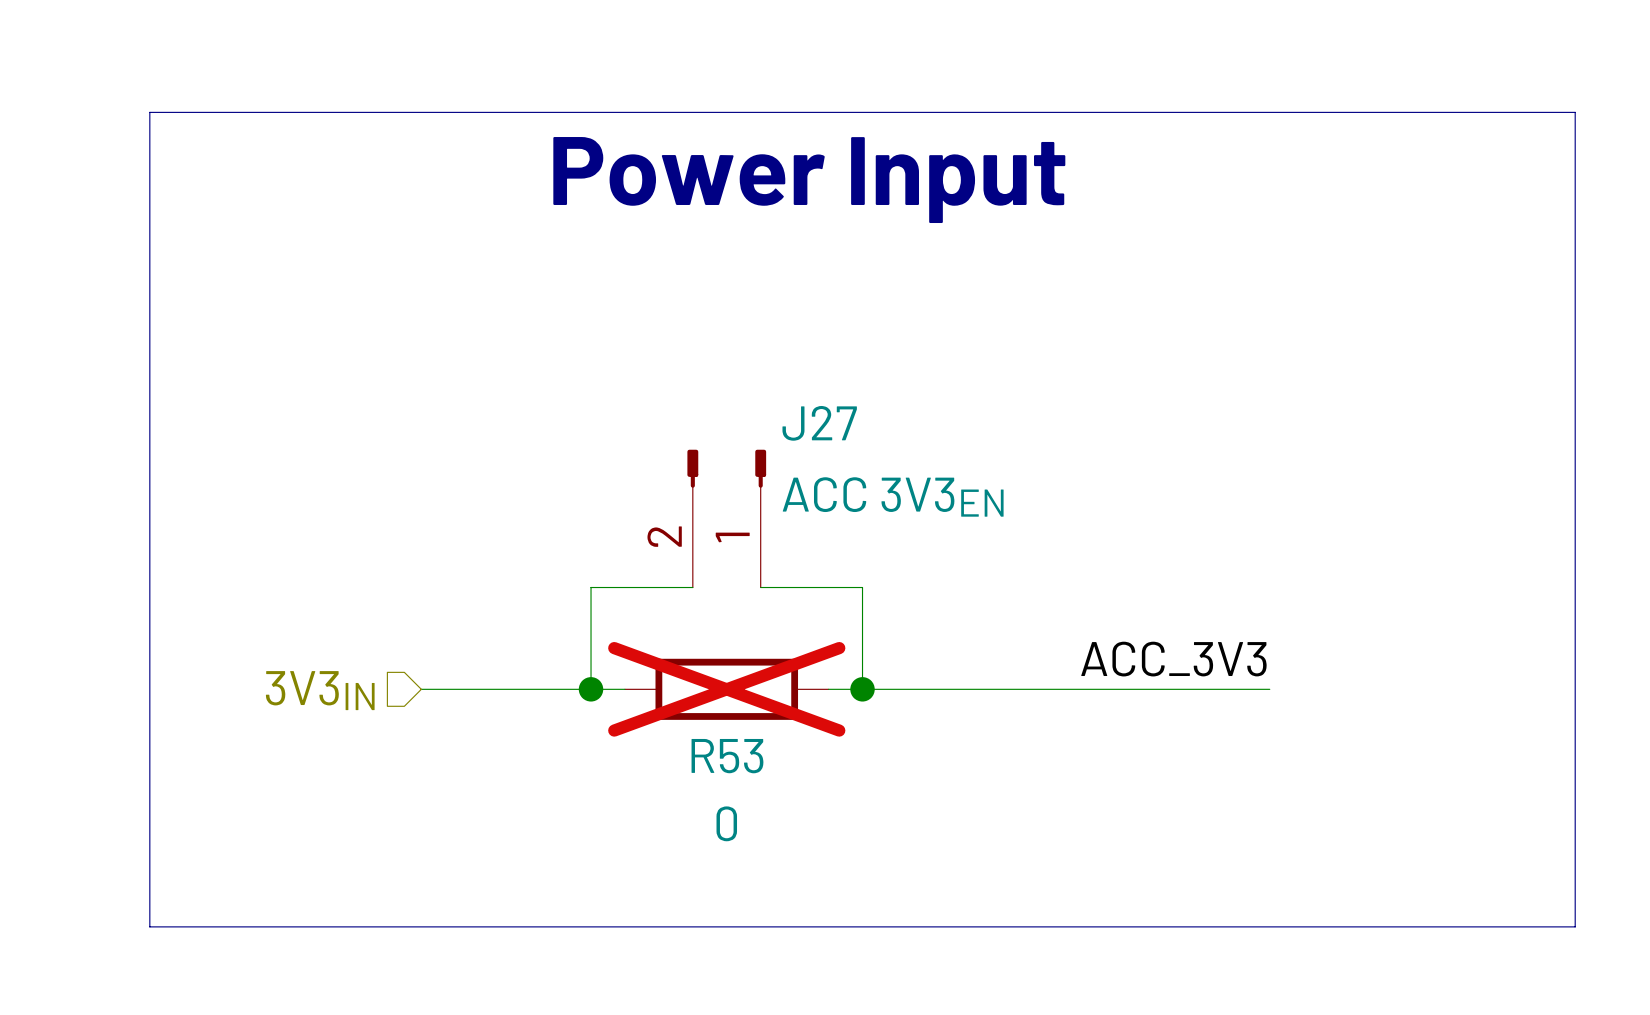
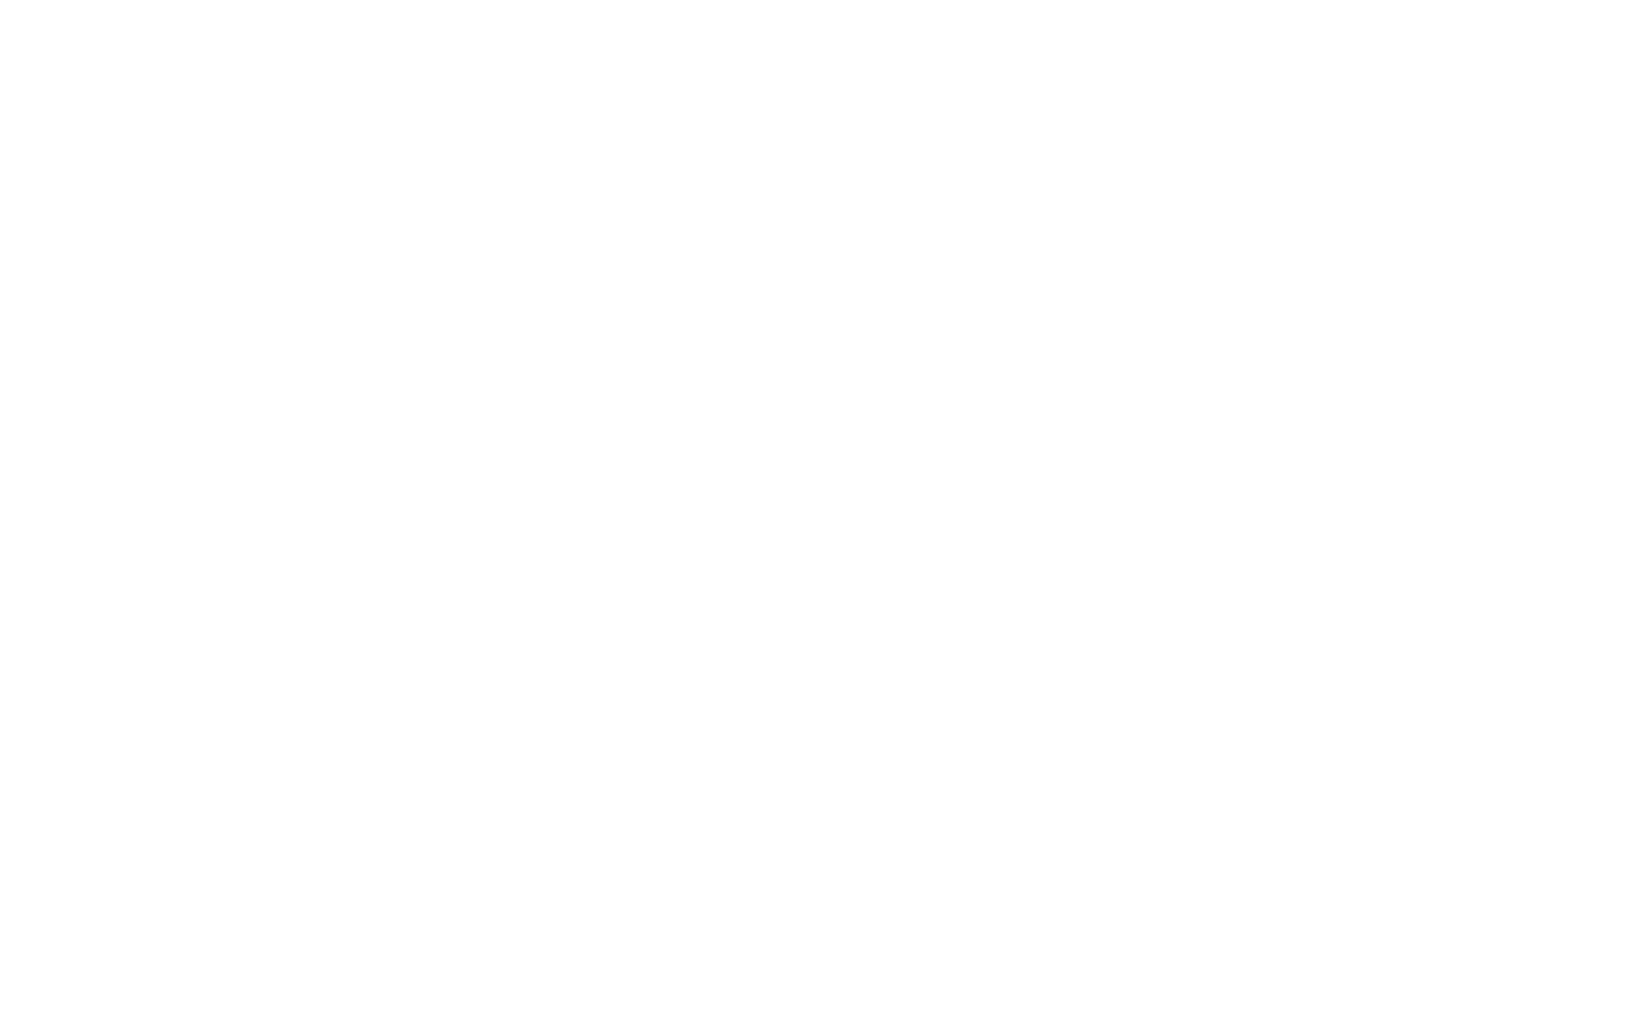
line: (149, 112) (1575, 112) (1575, 926) (149, 926) (149, 112) -> none
text: Power Input (809, 180) -> none
J27: ACC 3V3EN (726, 518) -> none
wire: (692, 587) (591, 587) (591, 689) -> none
wire: (760, 587) (862, 587) (862, 689) -> none
label: ACC_3V3 (1173, 659) -> none
wire: (421, 689) (624, 689) -> none
junction: (591, 689) -> none
R53: 0 (726, 689) -> none
wire: (828, 689) (1269, 689) -> none
junction: (862, 689) -> none
hierarchical label: 3V3IN (320, 690) -> none

